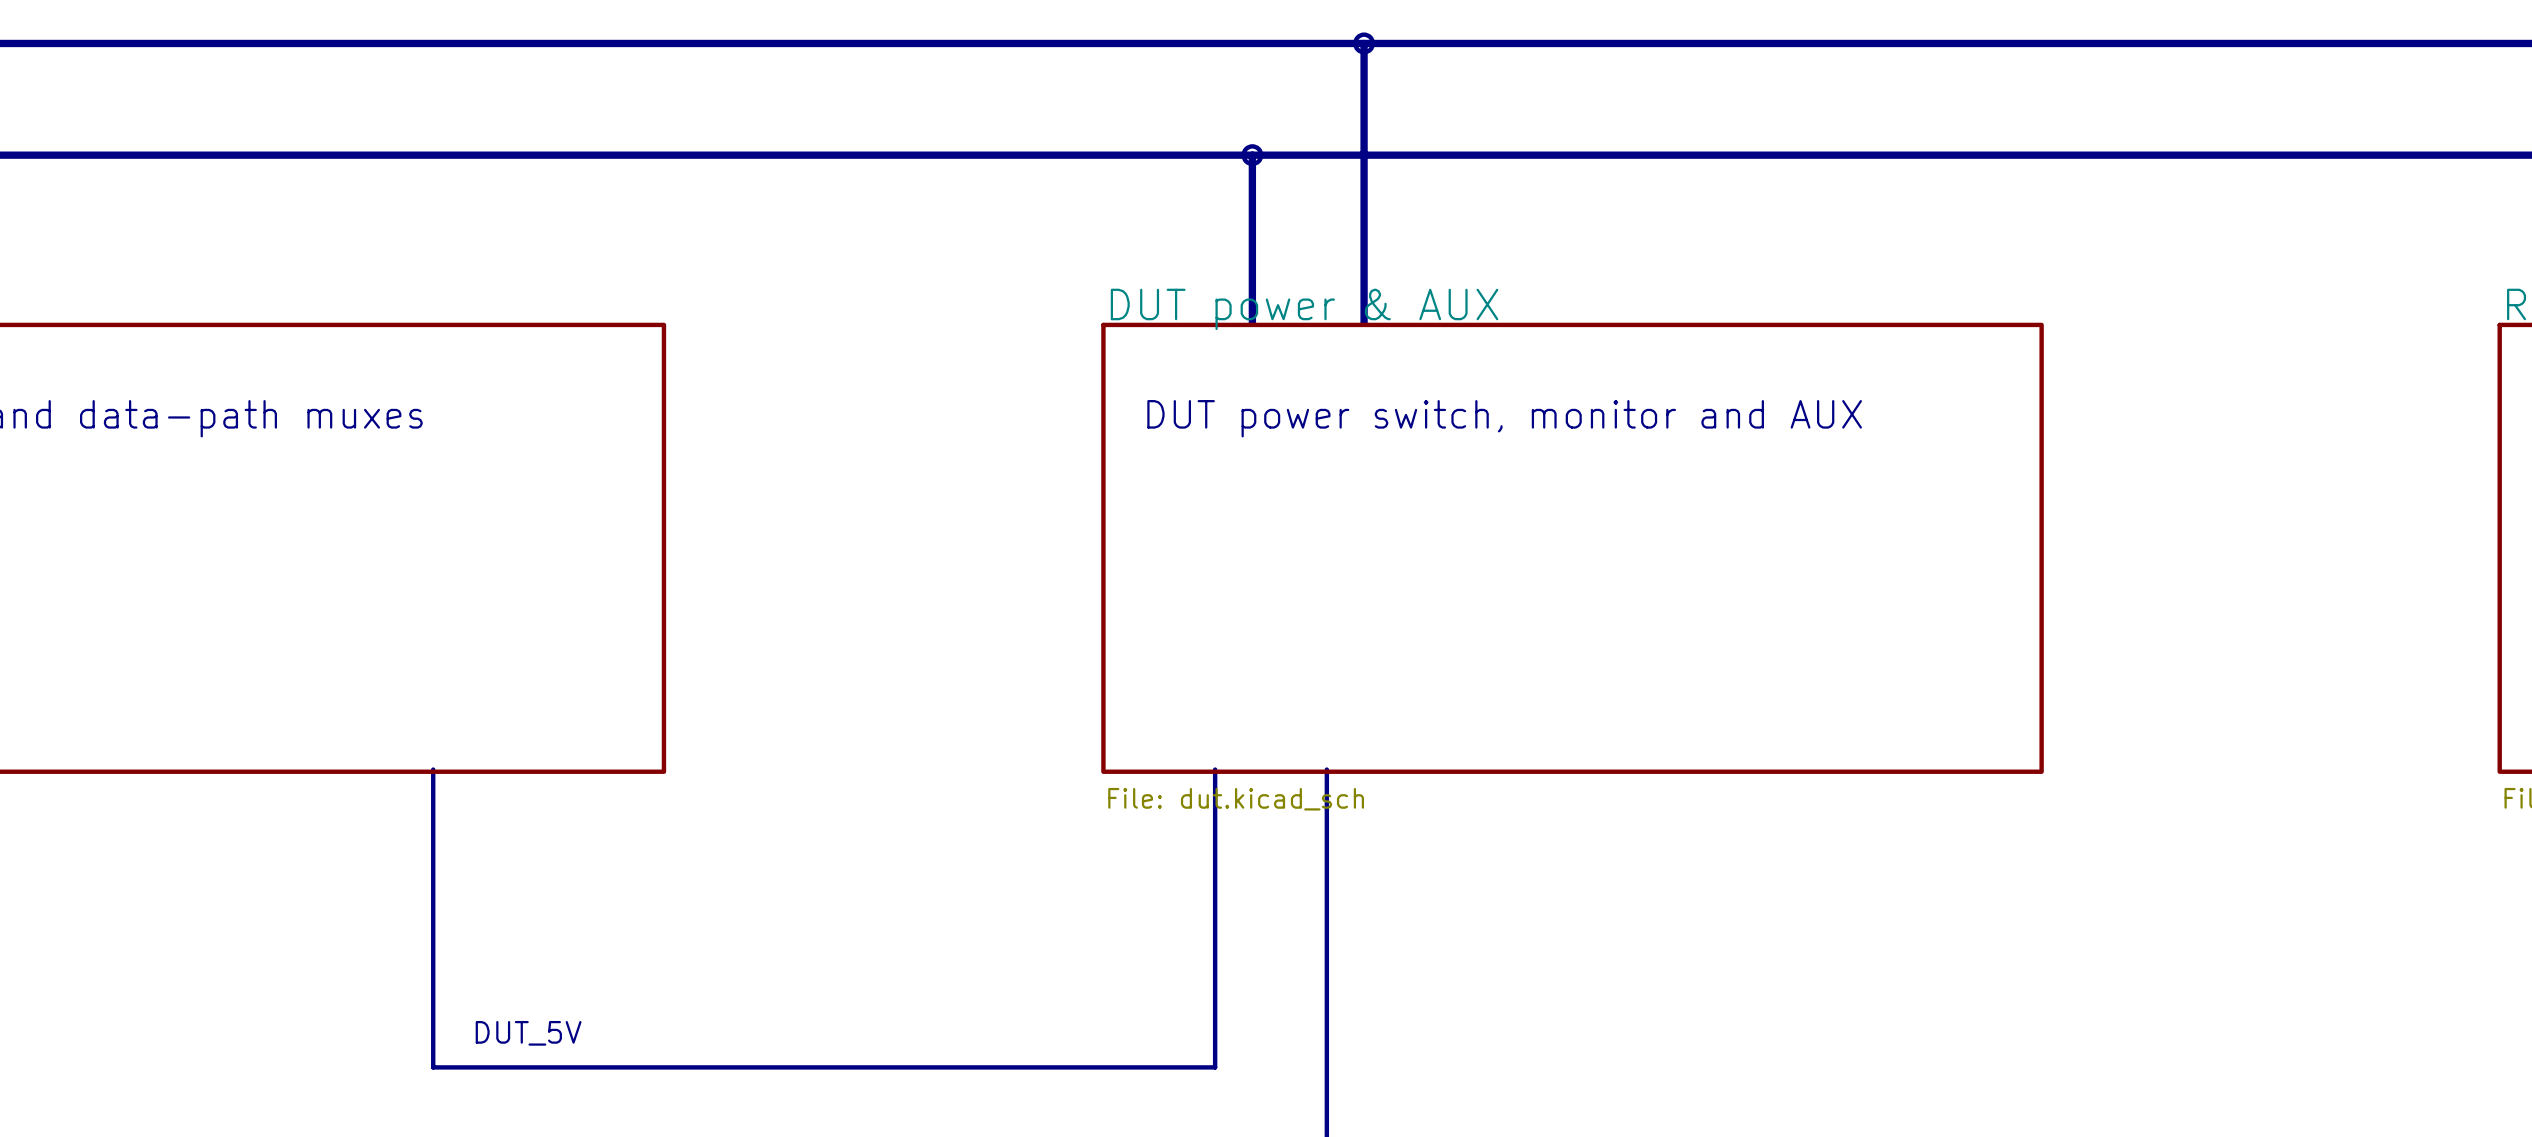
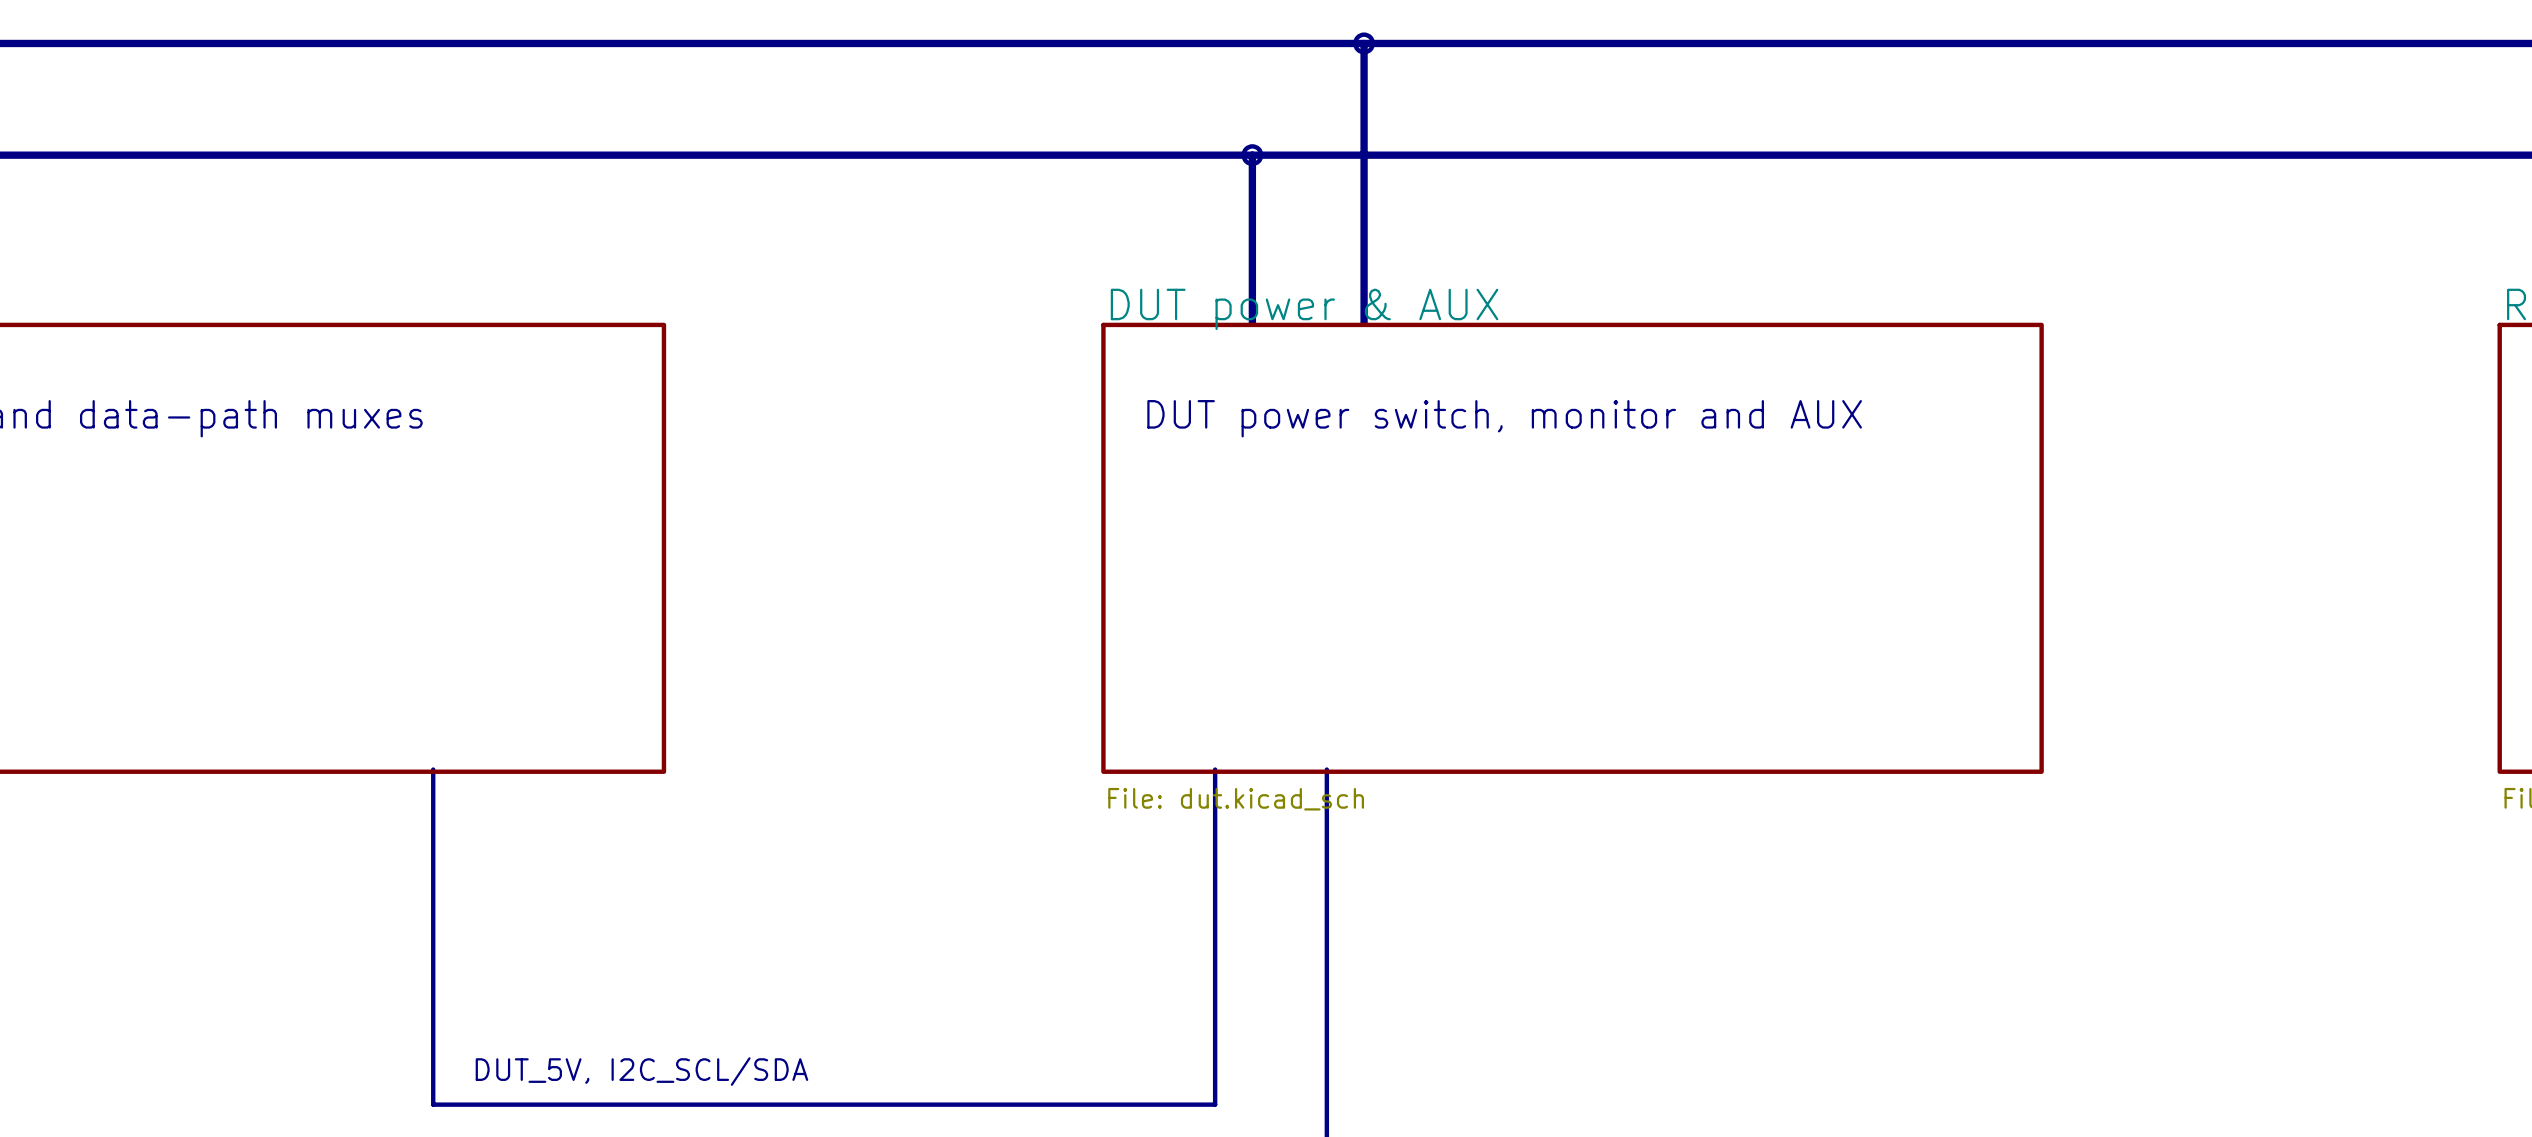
text: DUT_5V (528, 1033) -> none
line: (433, 1067) (1215, 1067) -> (433, 1067) (433, 1104) (1215, 1104) (1215, 1067)
text: none -> DUT_5V, I2C_SCL/SDA (641, 1071)

